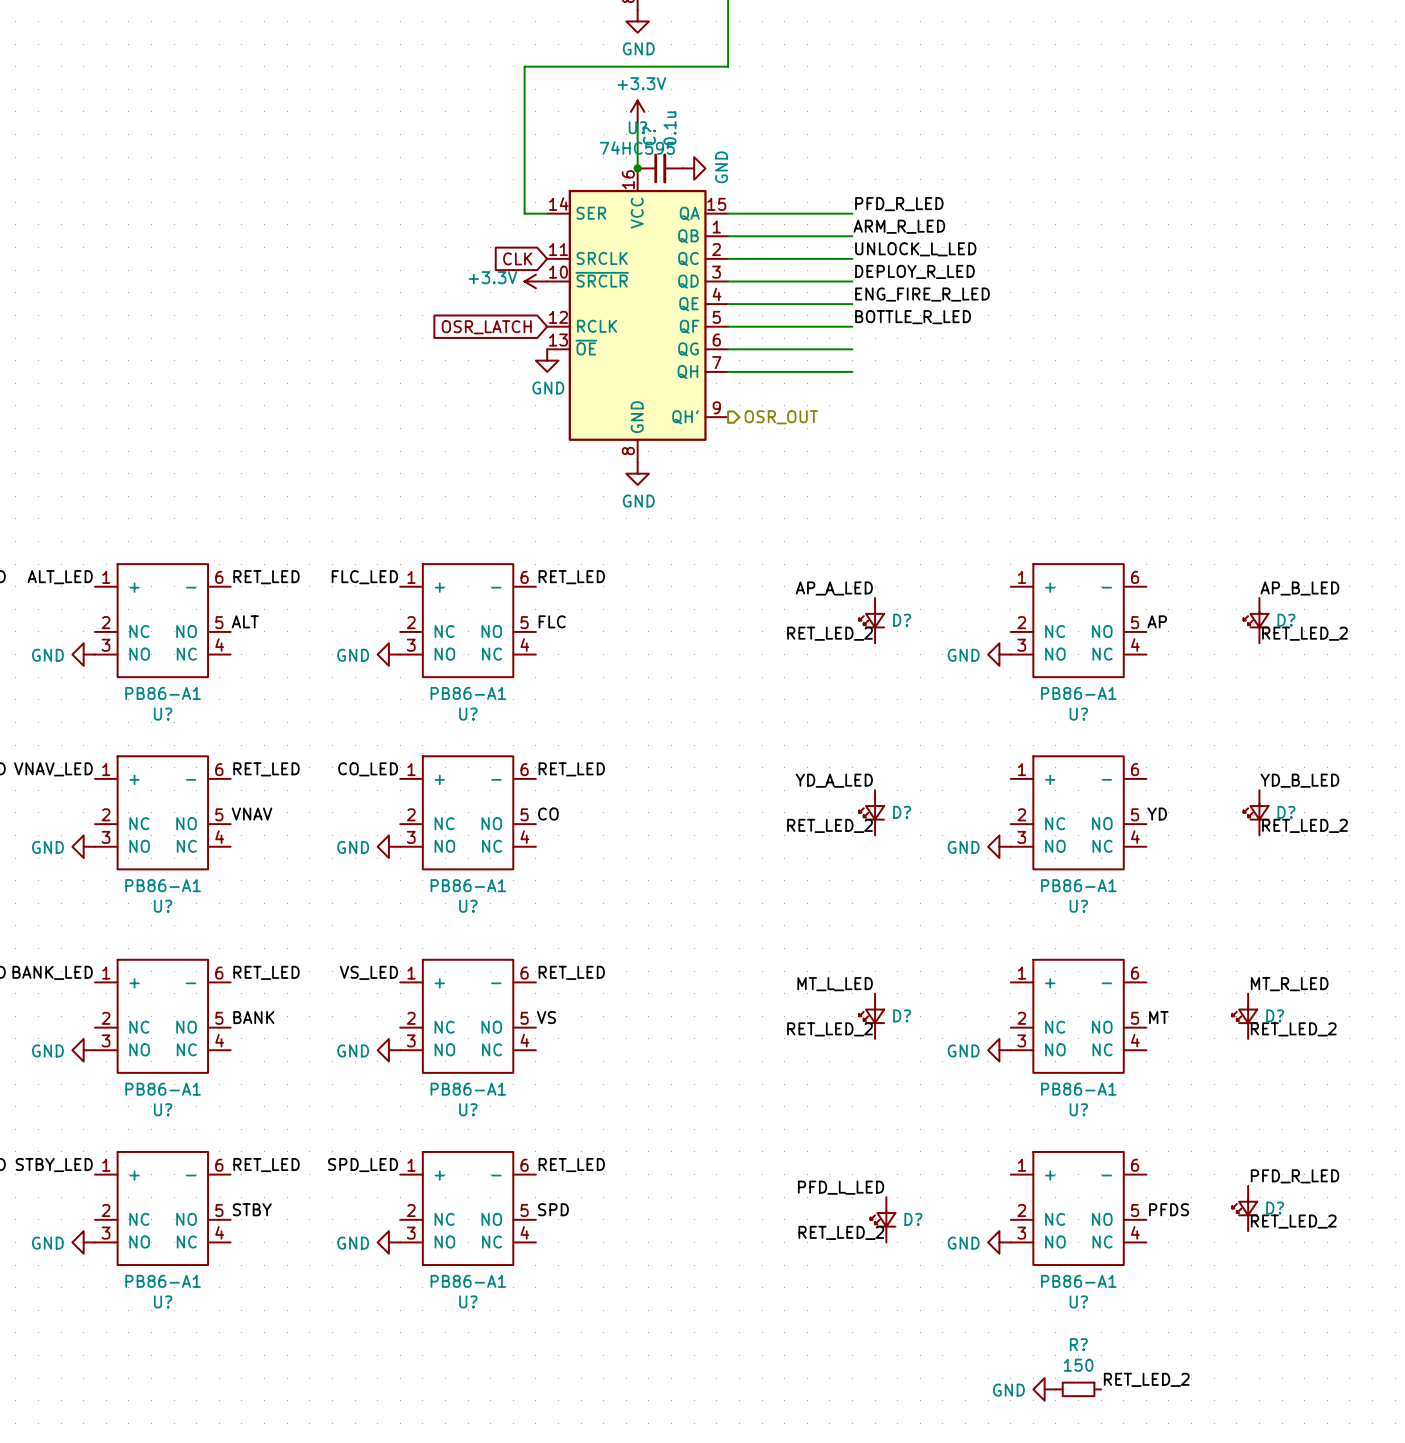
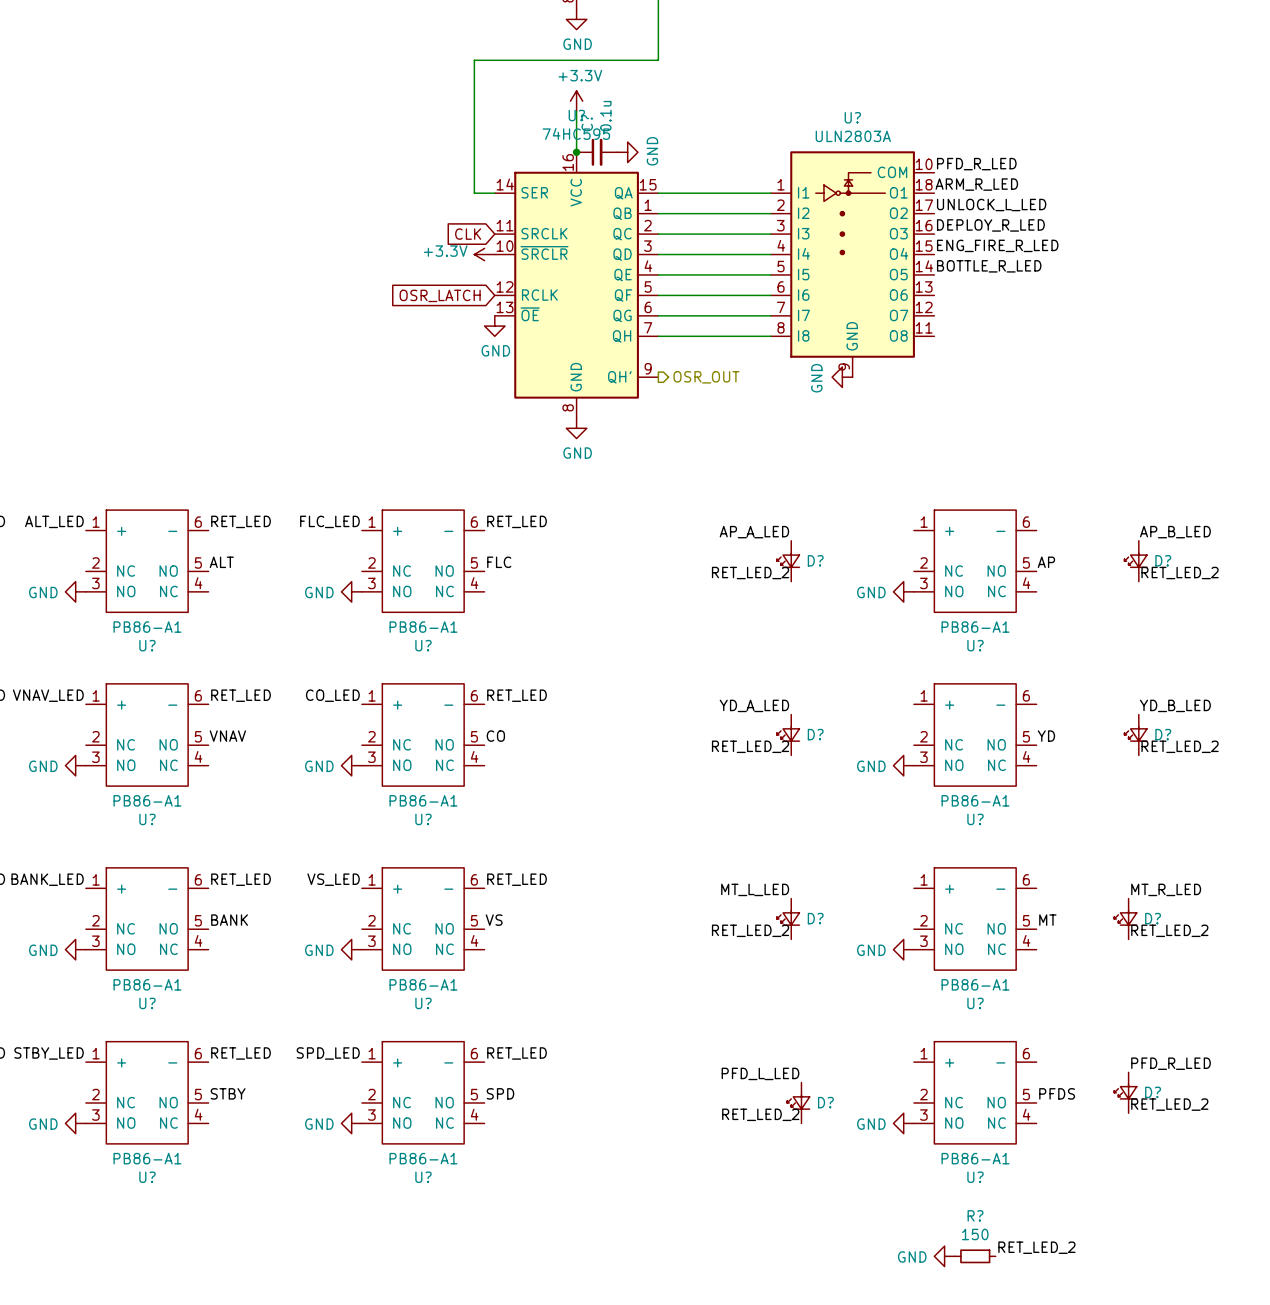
label position: PFD_R_LED (899, 204) -> PFD_R_LED (976, 164)
label position: ARM_R_LED (899, 226) -> ARM_R_LED (976, 184)
label position: UNLOCK_L_LED (915, 249) -> UNLOCK_L_LED (991, 205)
label position: DEPLOY_R_LED (914, 271) -> DEPLOY_R_LED (990, 225)
U?: none -> ULN2803A (852, 264)
label position: ENG_FIRE_R_LED (922, 294) -> ENG_FIRE_R_LED (997, 245)
label position: BOTTLE_R_LED (913, 317) -> BOTTLE_R_LED (989, 266)
power symbol: none -> GND (842, 377)

